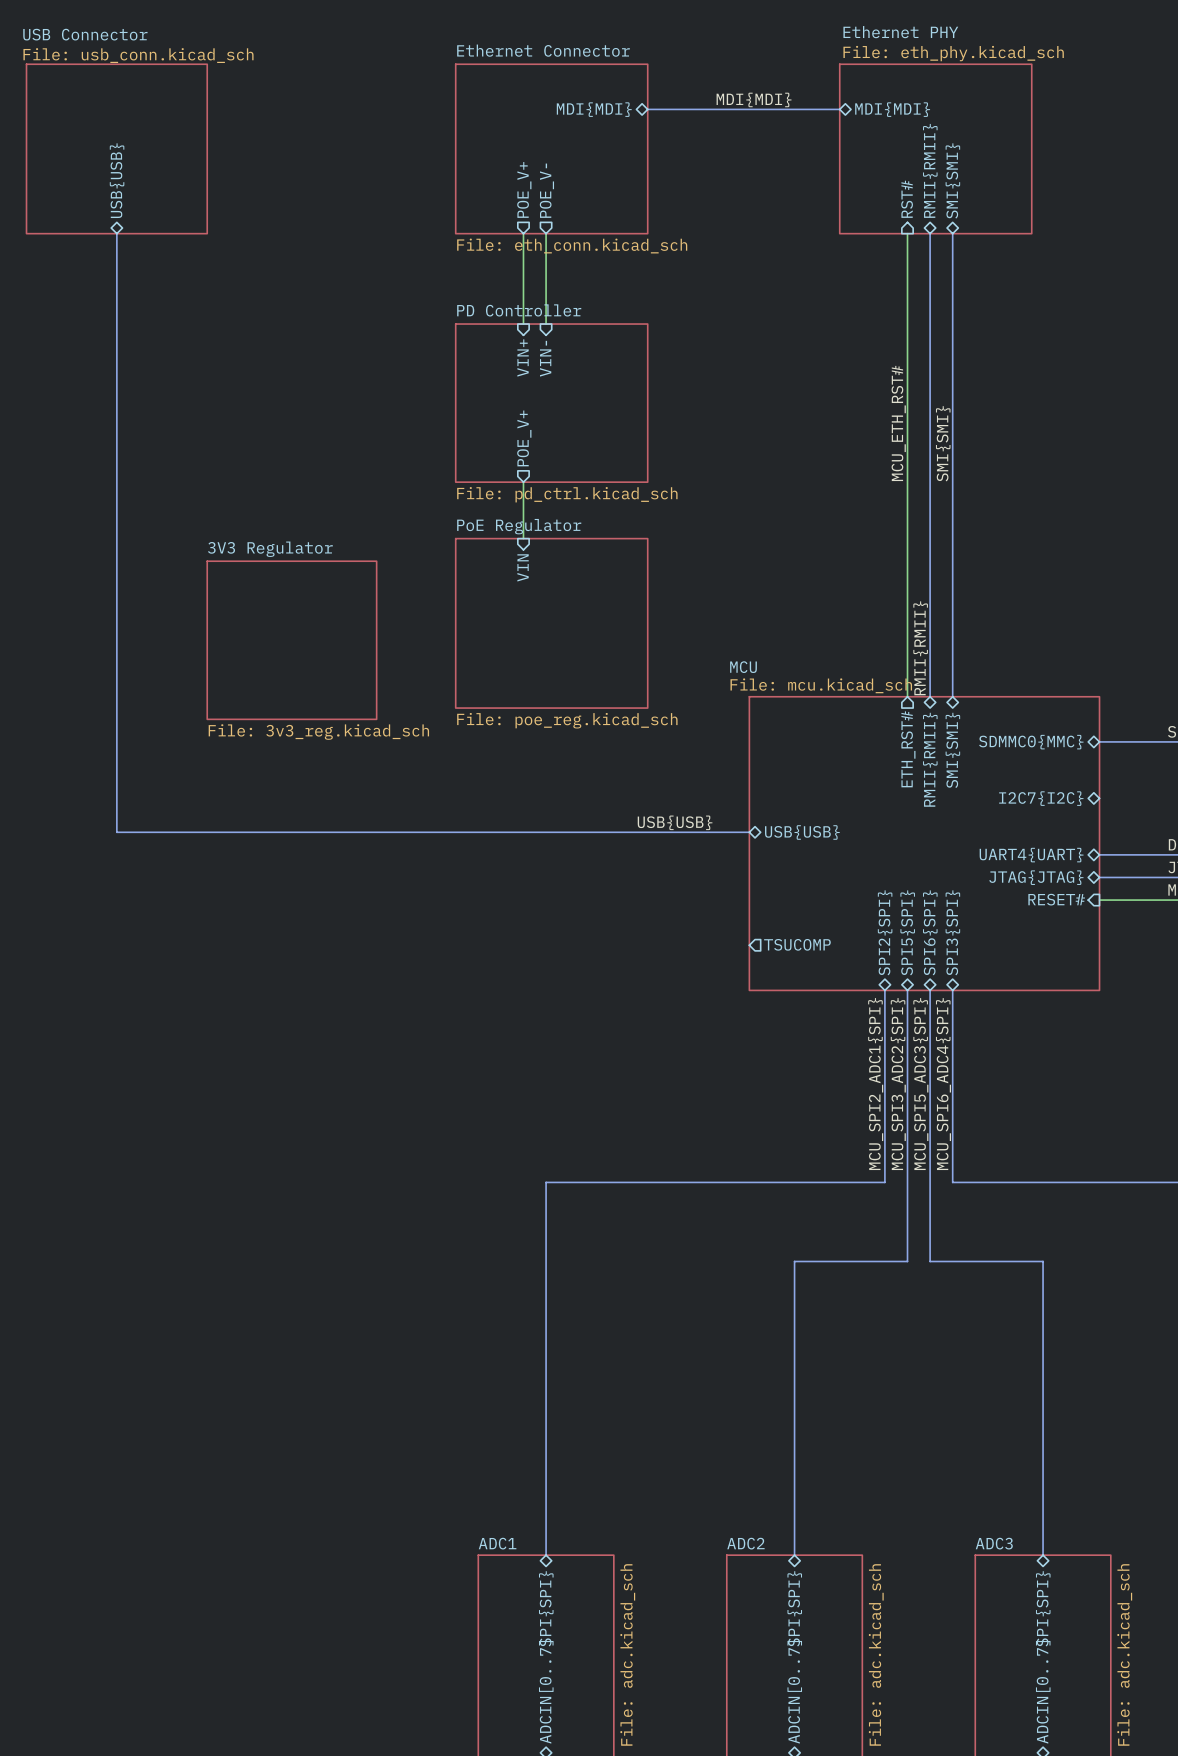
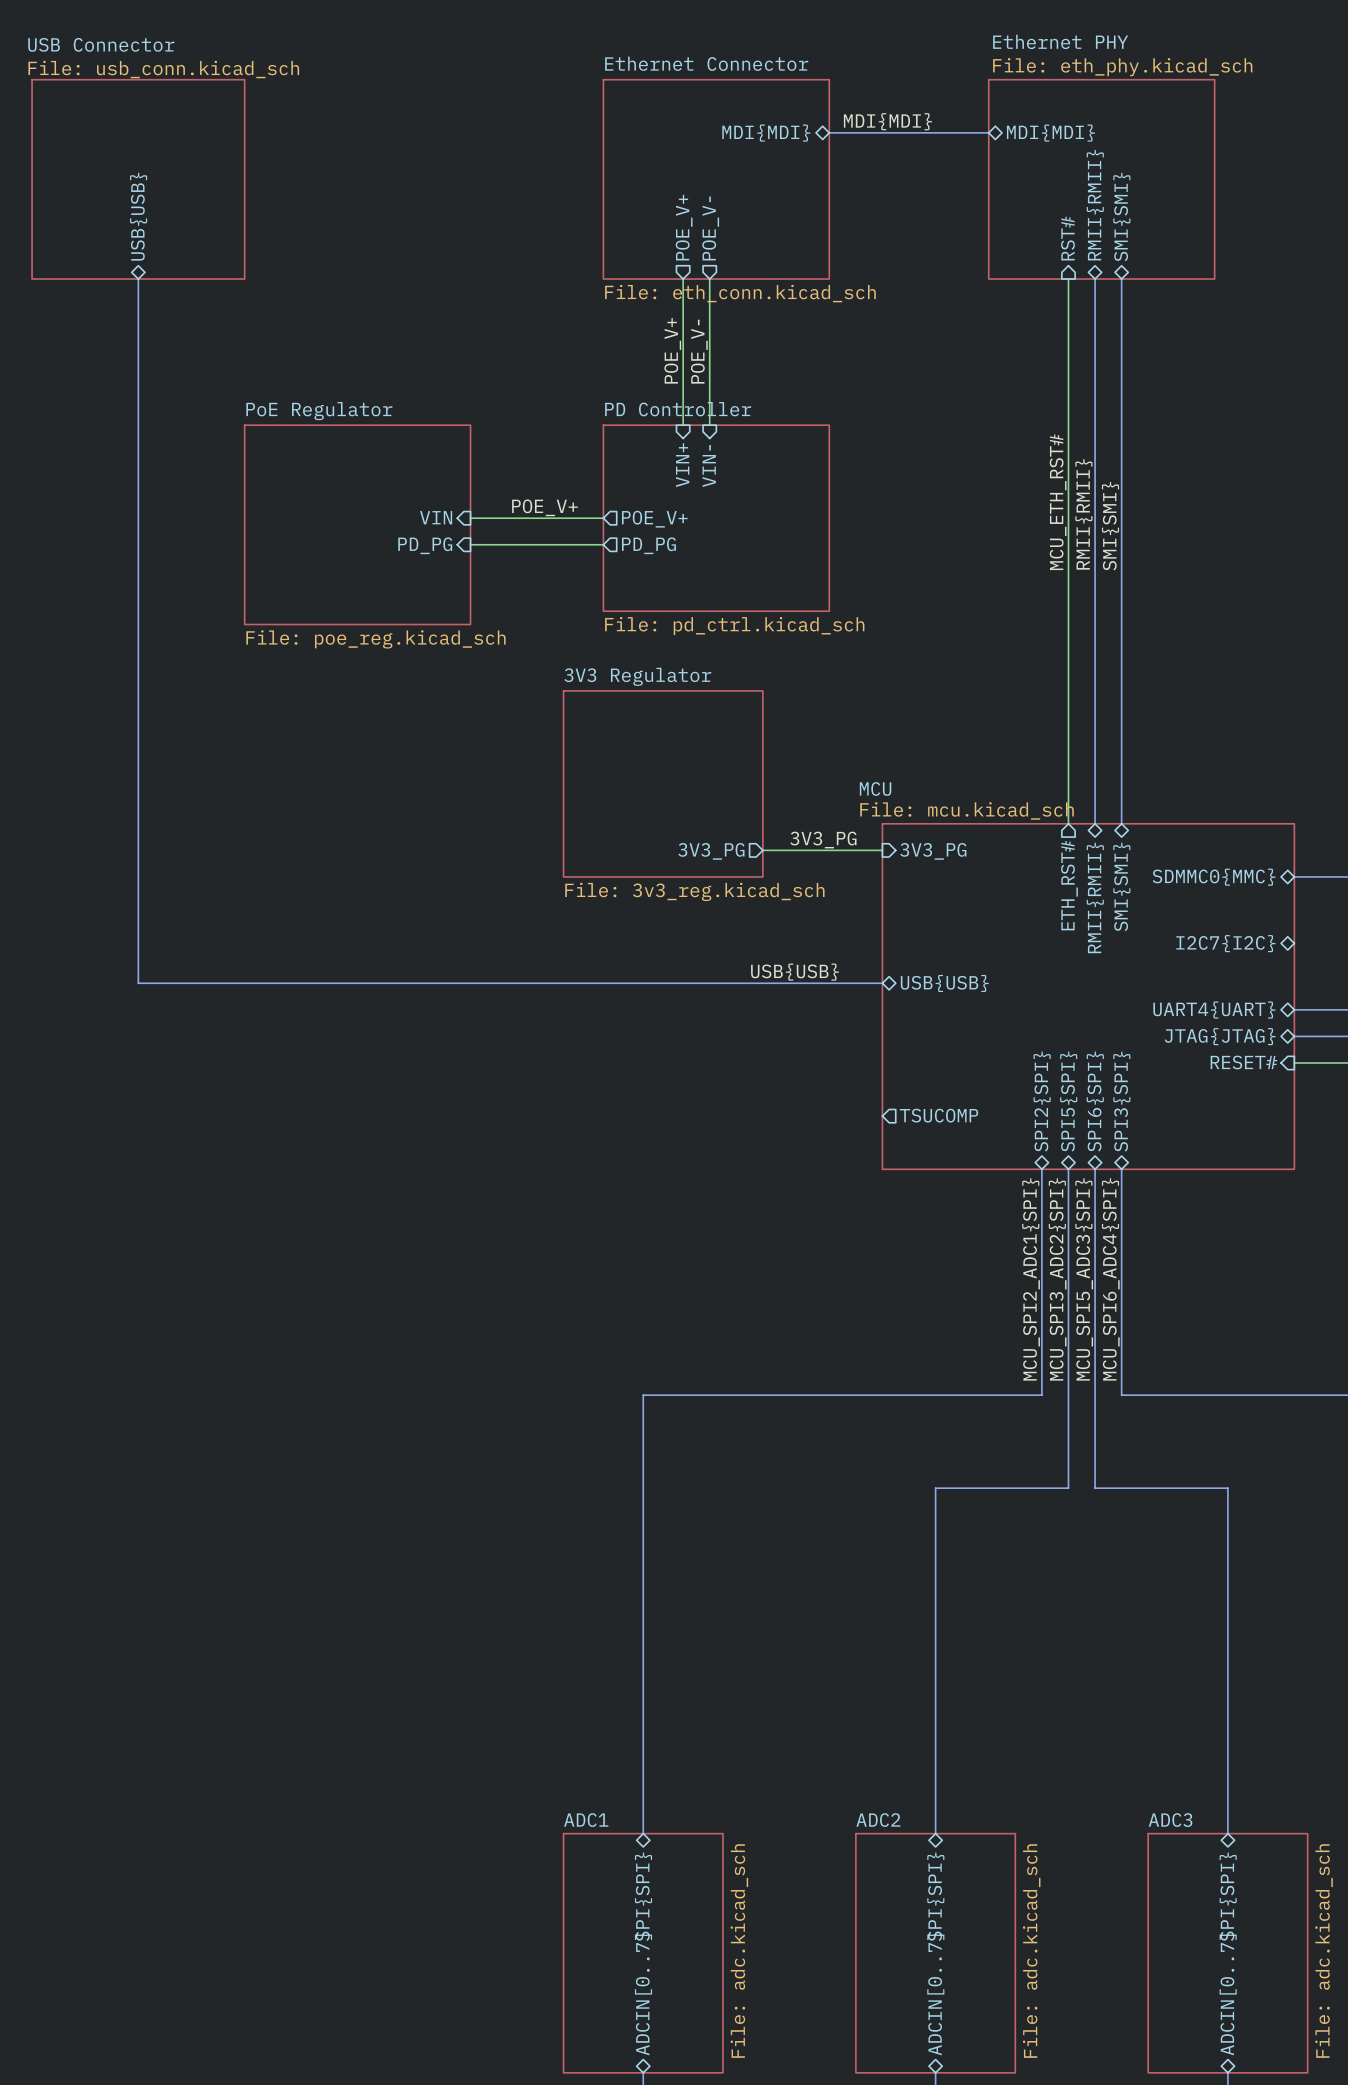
sheet pin position: MDI{MDI} (594, 109) -> MDI{MDI} (766, 133)
bus: (647, 109) (704, 109) -> none
sheet Ethernet Connector position: (551, 148) -> (716, 179)
sheet pin position: POE_V+ (524, 189) -> POE_V+ (684, 227)
sheet pin position: POE_V- (546, 190) -> POE_V- (710, 228)
wire: (523, 233) (523, 324) -> none
wire: (546, 233) (546, 324) -> none
wire: none -> (683, 279) (683, 425)
wire: none -> (709, 279) (709, 425)
label: none -> POE_V+ (672, 350)
label: none -> POE_V- (699, 351)
sheet pin position: VIN+ (523, 358) -> VIN+ (682, 465)
sheet pin position: VIN- (545, 358) -> VIN- (709, 466)
sheet PD Controller position: (551, 403) -> (716, 518)
label: none -> POE_V+ (544, 507)
wire: none -> (470, 518) (603, 518)
sheet pin rotation: 0° (524, 438) -> 90° clockwise (654, 519)
sheet PoE Regulator: none -> File: poe_reg.kicad_sch (357, 524)
wire: none -> (470, 544) (603, 544)
sheet pin: none -> PD_PG (425, 545)
sheet pin: none -> PD_PG (648, 545)
wire: (523, 482) (523, 538) -> none
sheet pin rotation: 0° (523, 567) -> 90° clockwise (436, 517)
sheet pin position: VIN (523, 567) -> VIN (436, 517)
sheet PoE Regulator: File: poe_reg.kicad_sch (551, 623) -> none
sheet 3V3 Regulator position: (291, 640) -> (663, 783)
label position: RMII{RMII} (920, 648) -> RMII{RMII} (1083, 514)
label: none -> 3V3_PG (823, 840)
wire: none -> (762, 850) (882, 850)
sheet pin: none -> 3V3_PG (711, 851)
sheet pin: none -> 3V3_PG (933, 851)

